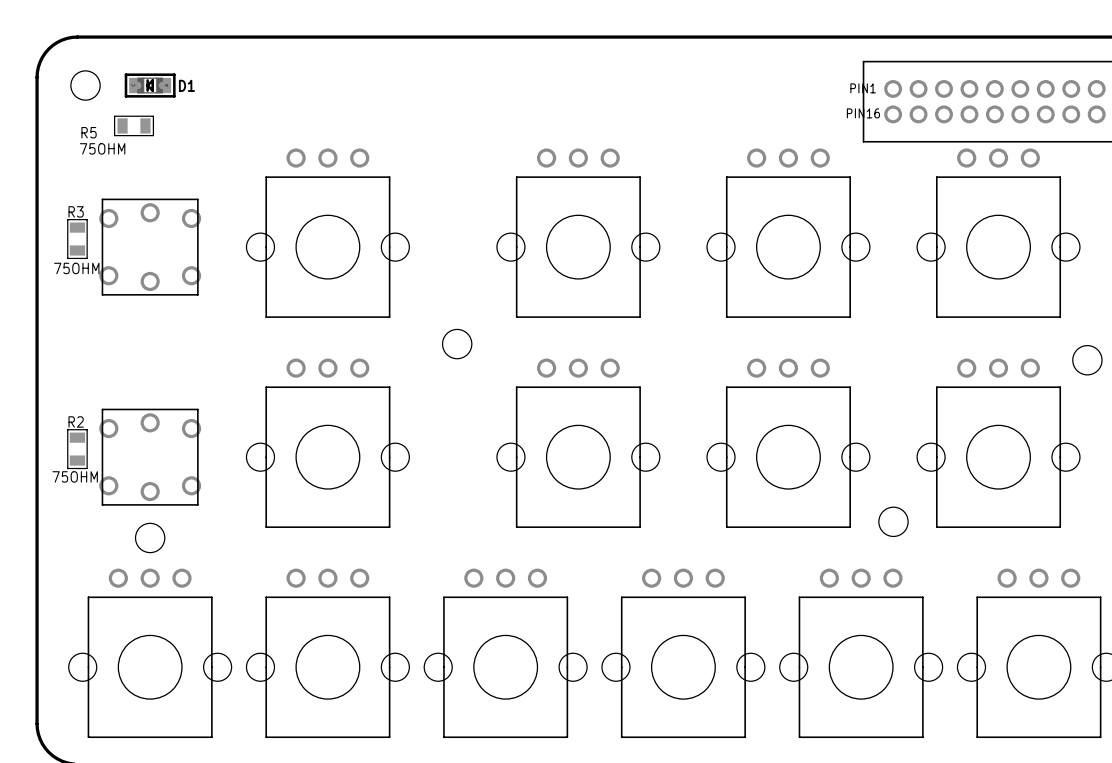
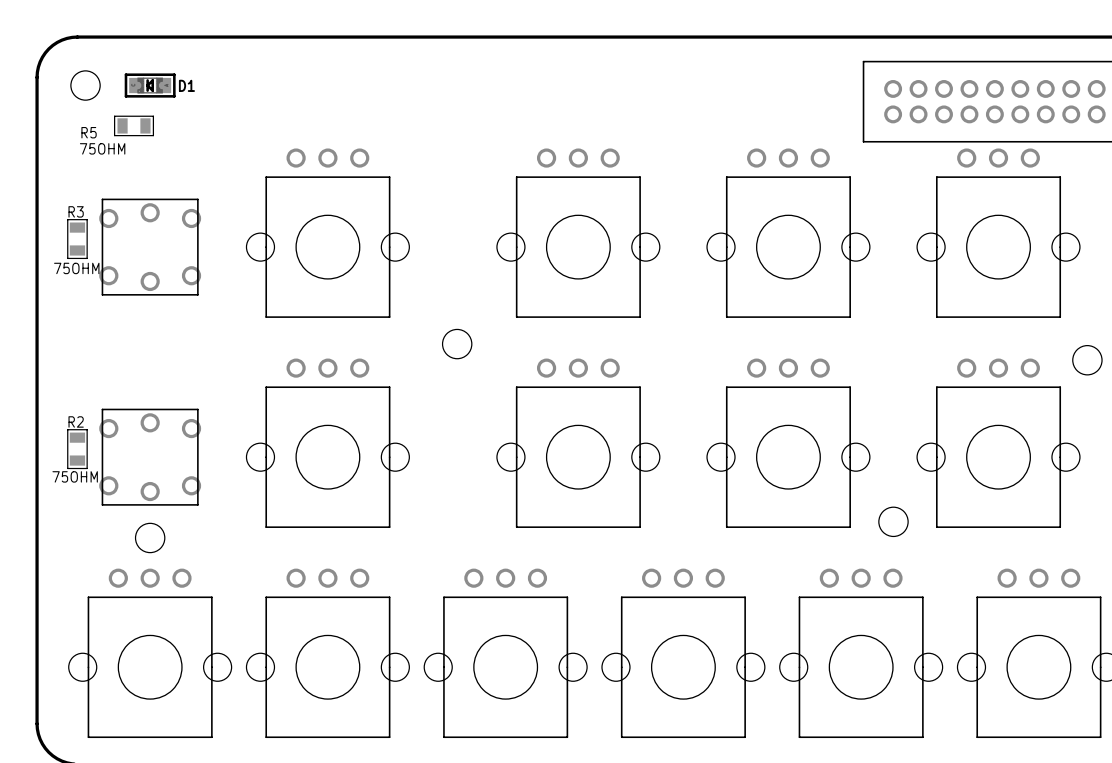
text: PIN1 (863, 88) -> none
text: PIN16 (863, 113) -> none

